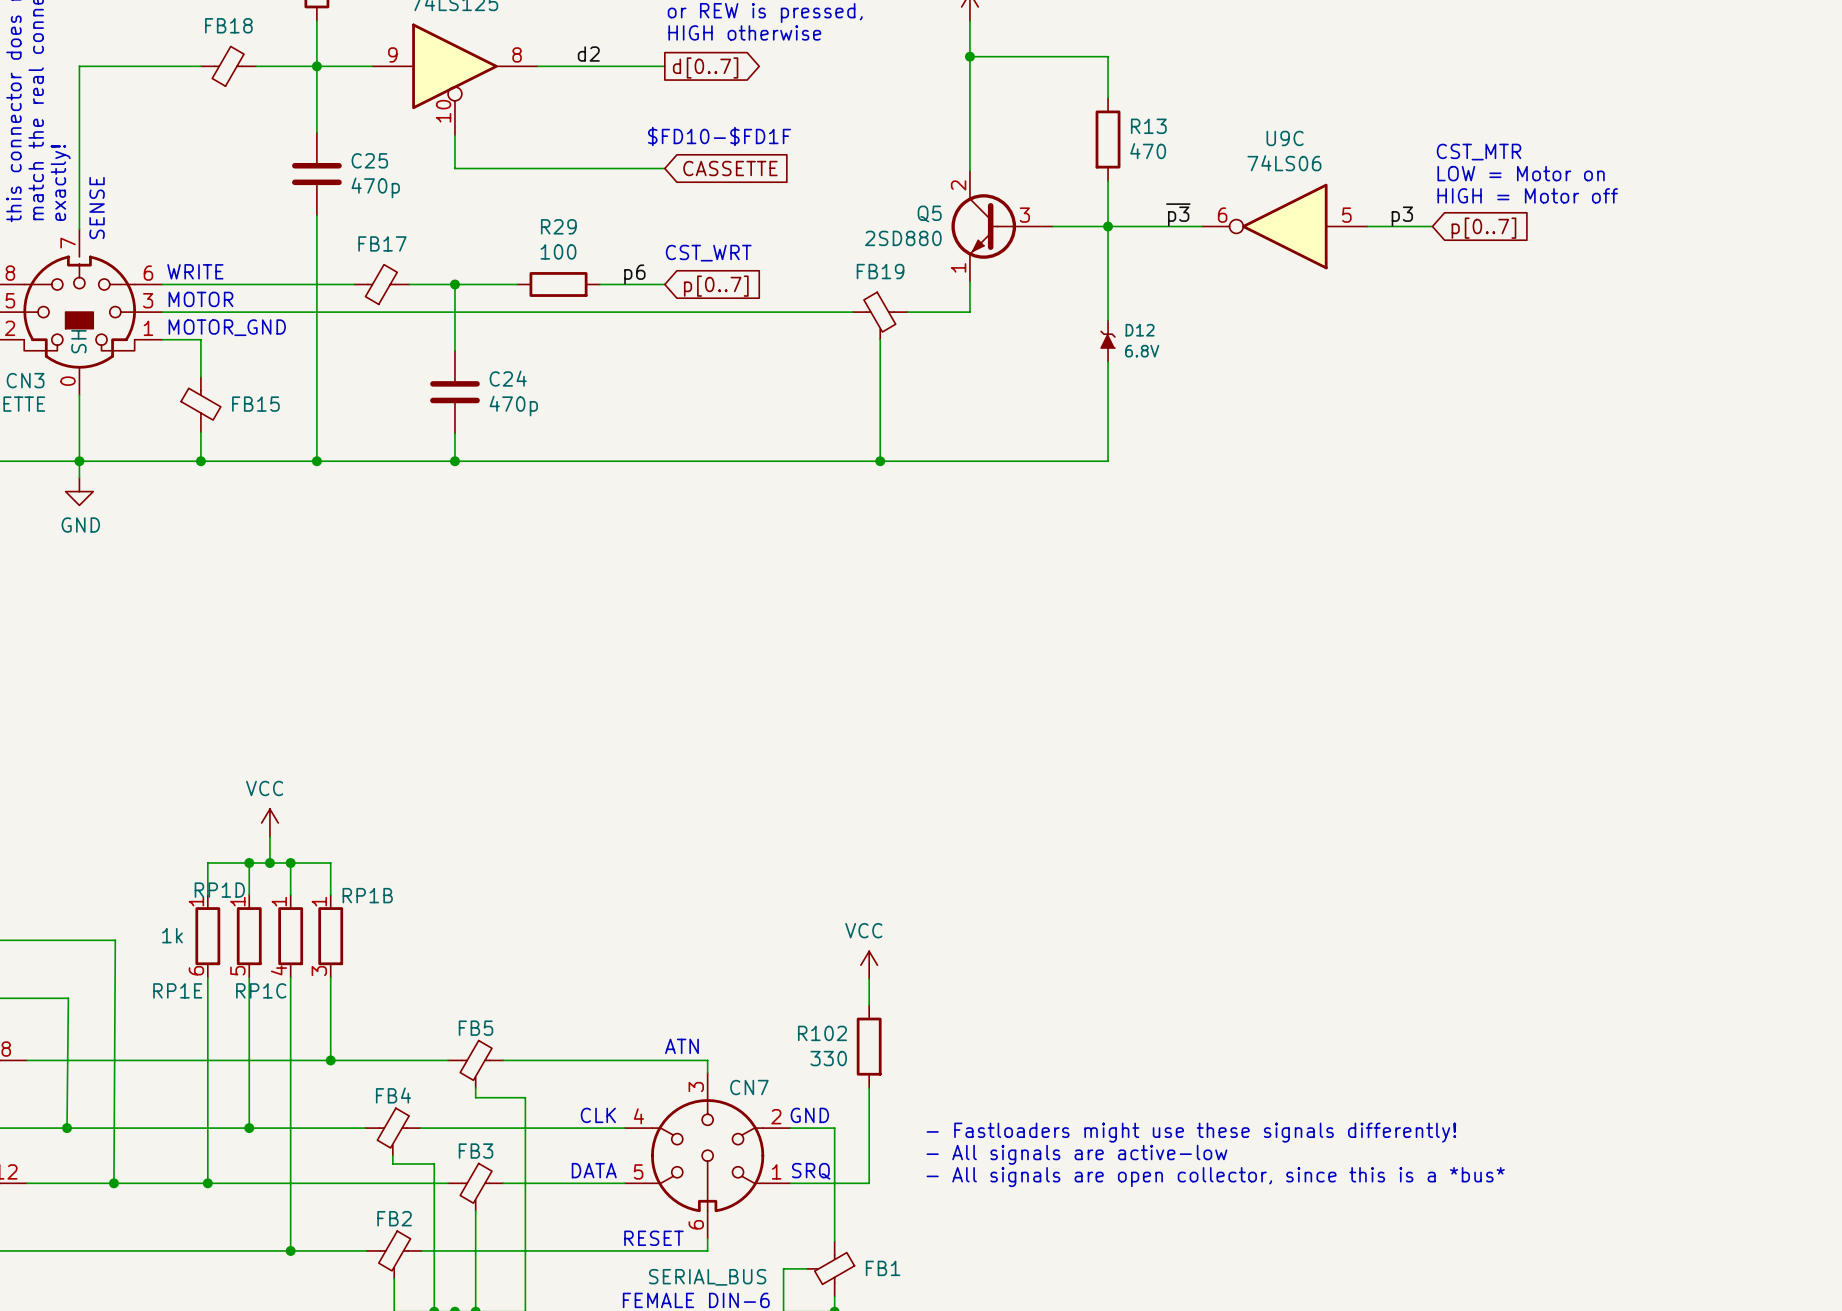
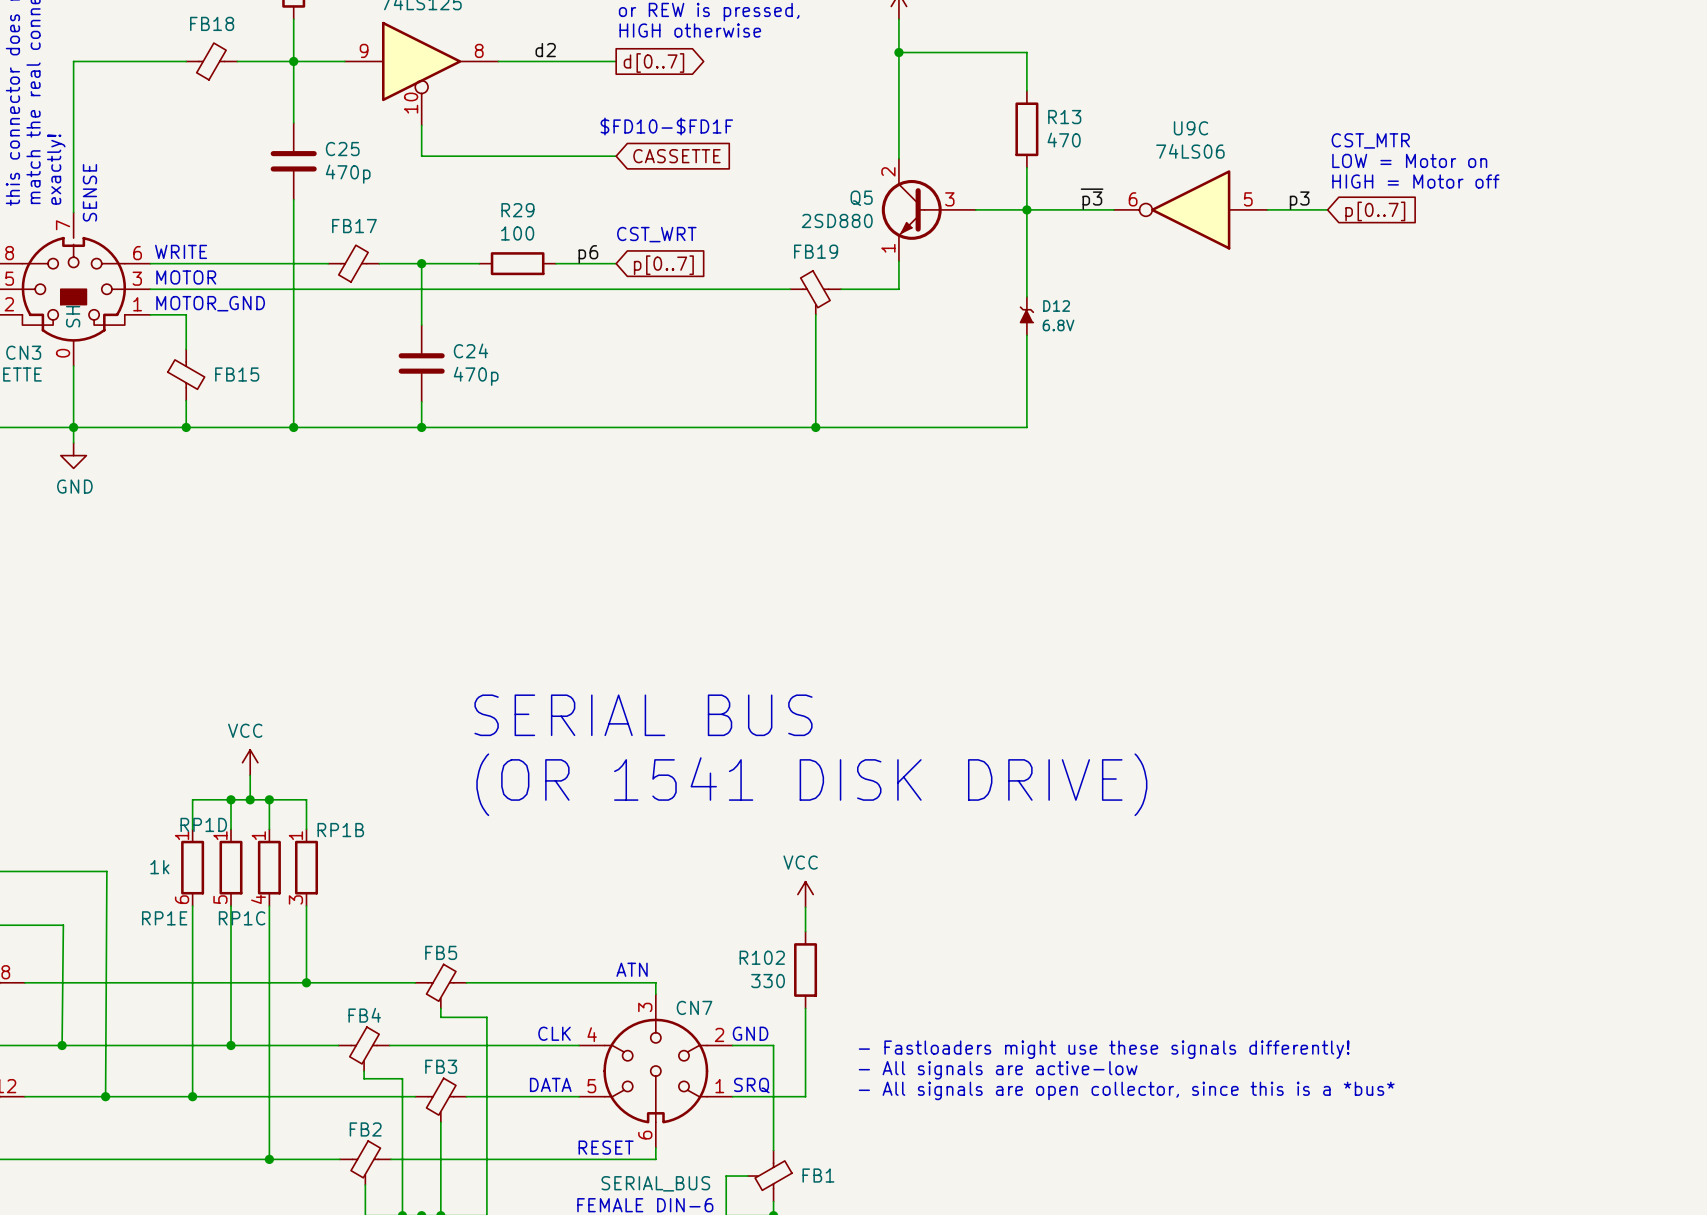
text: none -> SERIAL BUS (643, 715)
text: none -> (OR 1541 DISK DRIVE) (811, 784)

